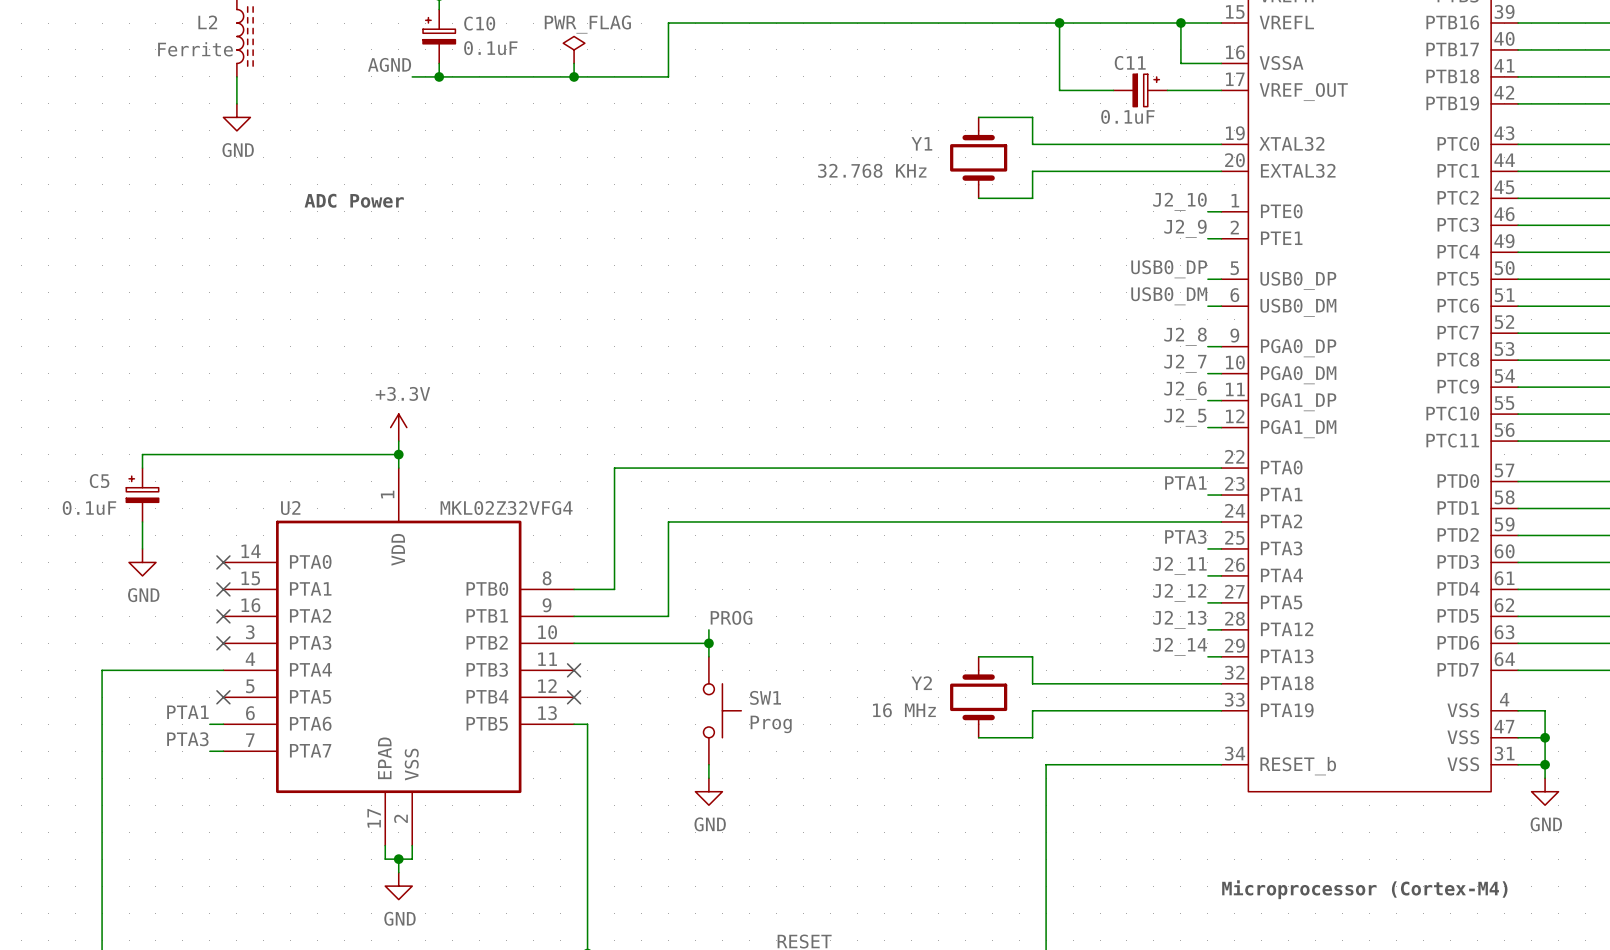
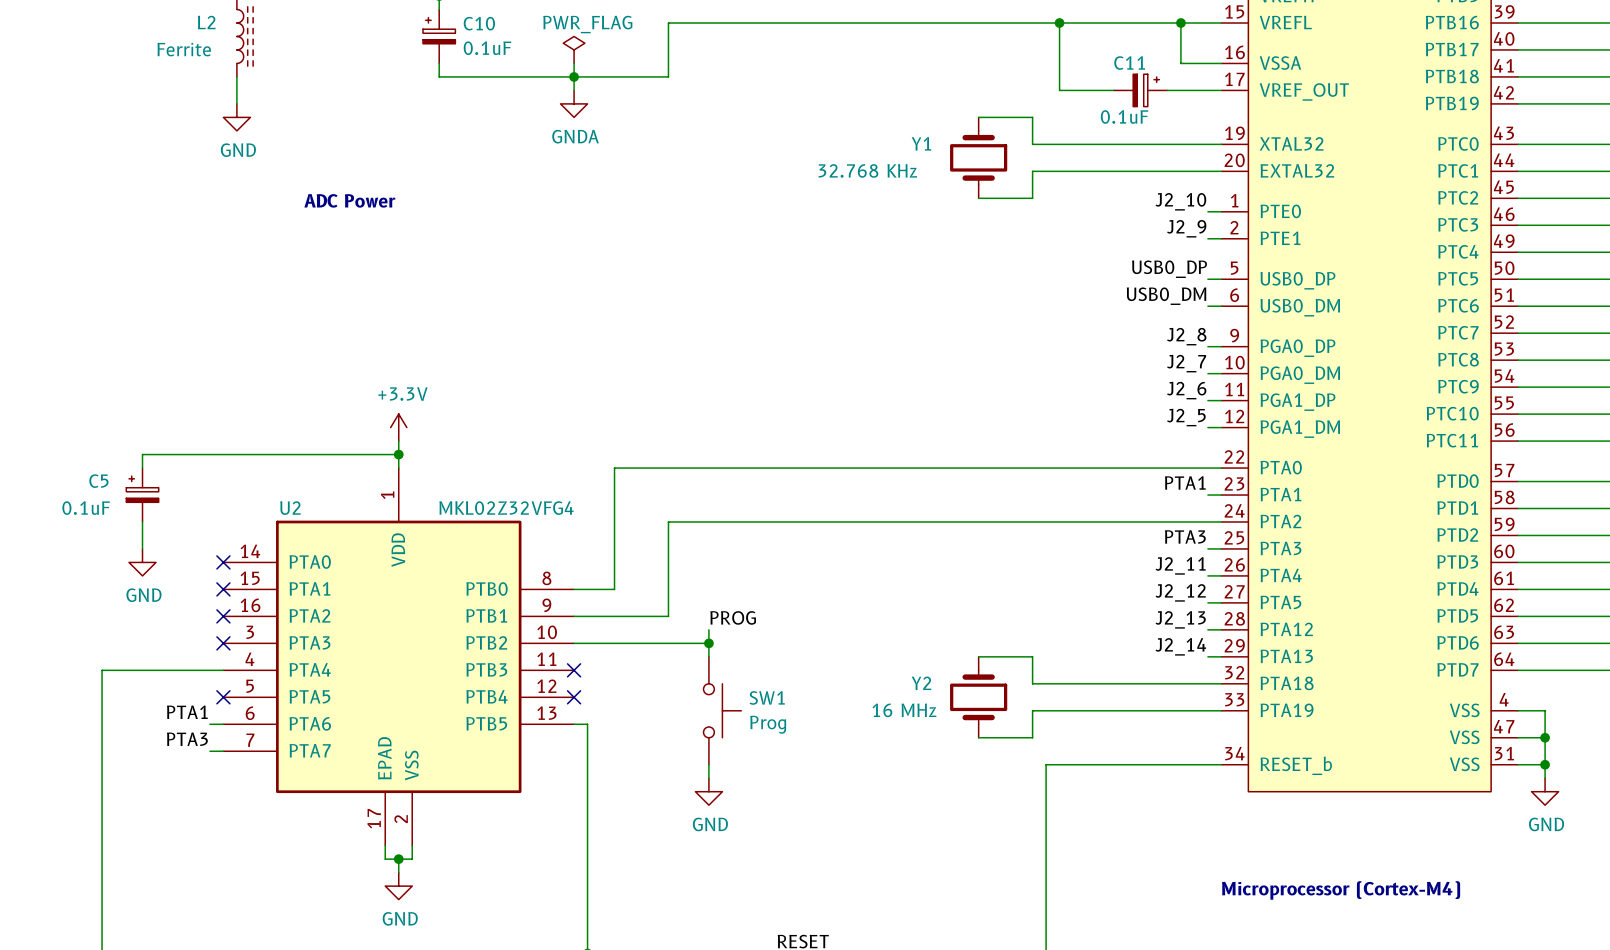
label: AGND (389, 64) -> none
wire: (412, 76) (439, 76) -> none
junction: (439, 76) -> none
wire: none -> (574, 76) (574, 90)
power symbol: none -> GNDA (574, 103)

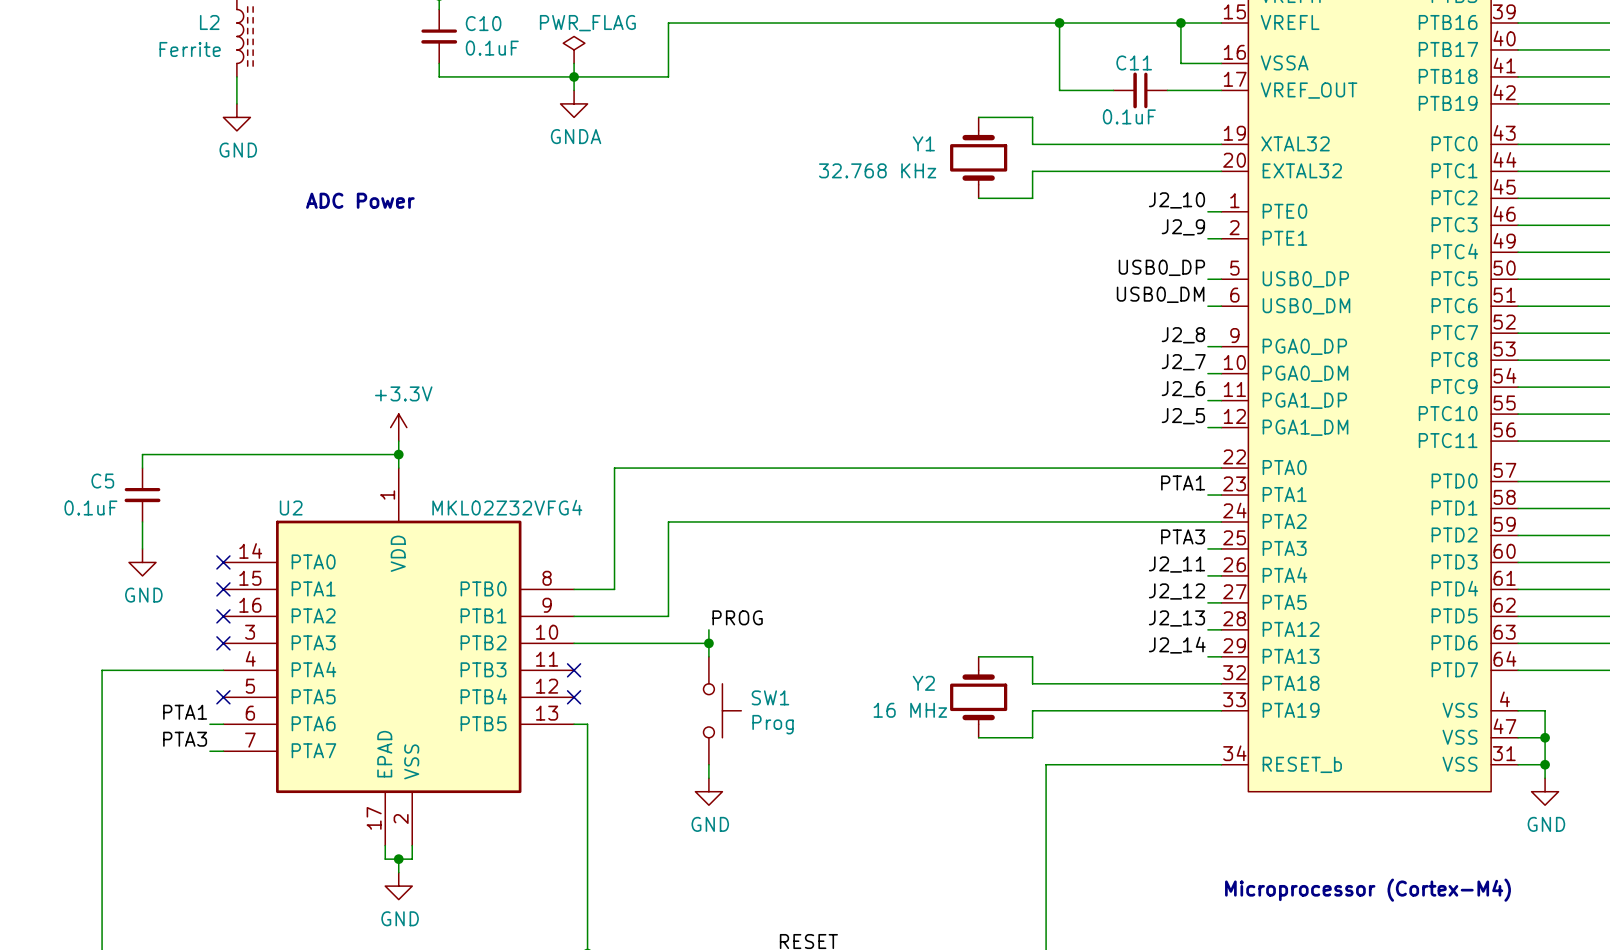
C10 symbol: [423, 9, 456, 64] -> [421, 9, 458, 64]
C11 symbol: [1113, 74, 1168, 107] -> [1113, 72, 1168, 109]
C5 symbol: [126, 468, 159, 522] -> [124, 468, 161, 522]

